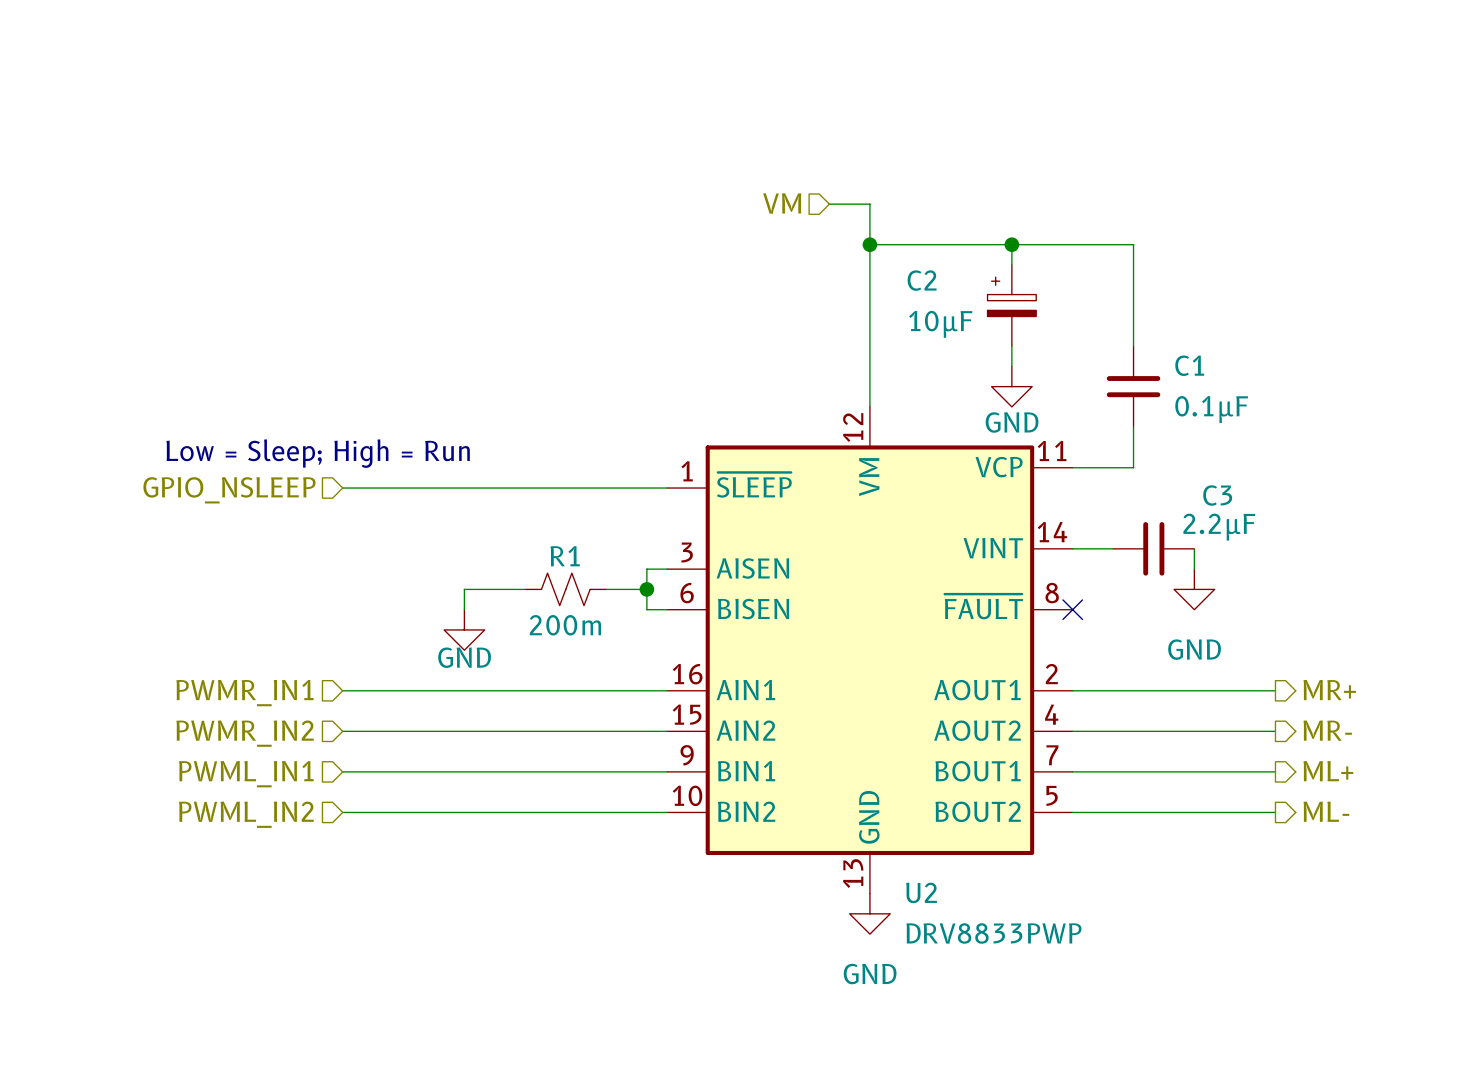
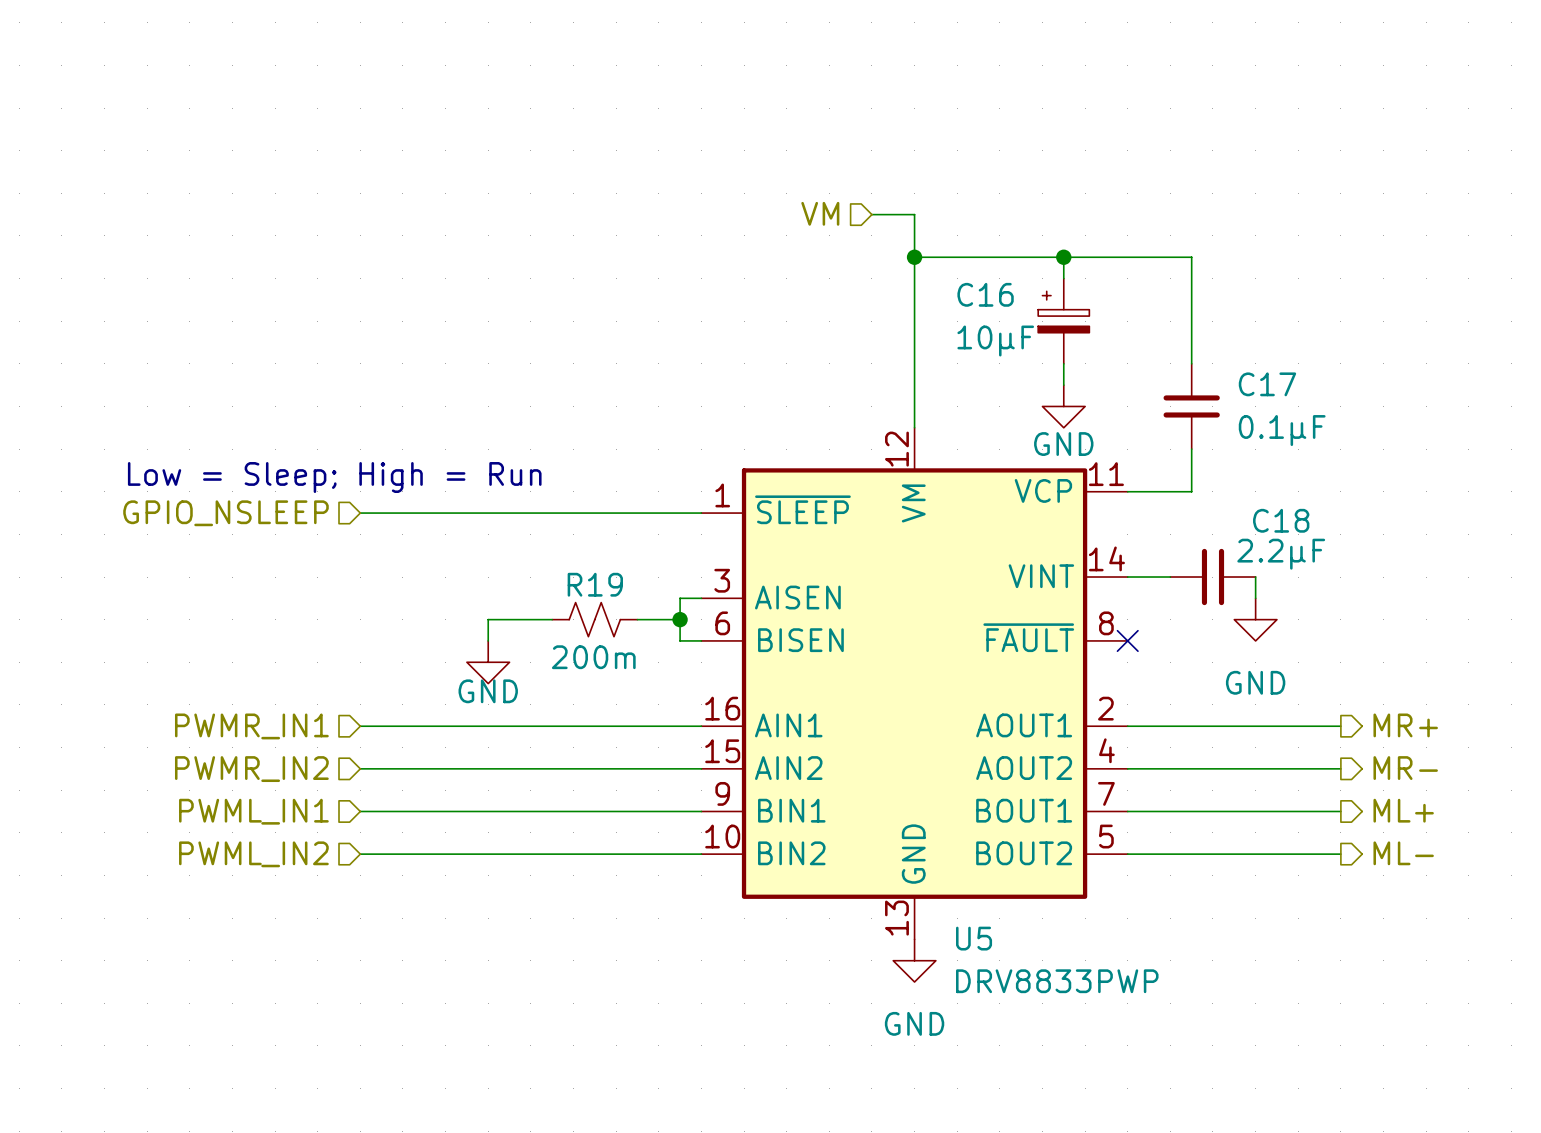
C2 name: C2 (922, 280) -> C16 (985, 294)
C1 name: C1 (1189, 365) -> C17 (1267, 384)
C3 name: C3 (1217, 495) -> C18 (1281, 520)
R1 name: R1 (565, 556) -> R19 (595, 584)
U2 name: U2 (921, 892) -> U5 (974, 938)

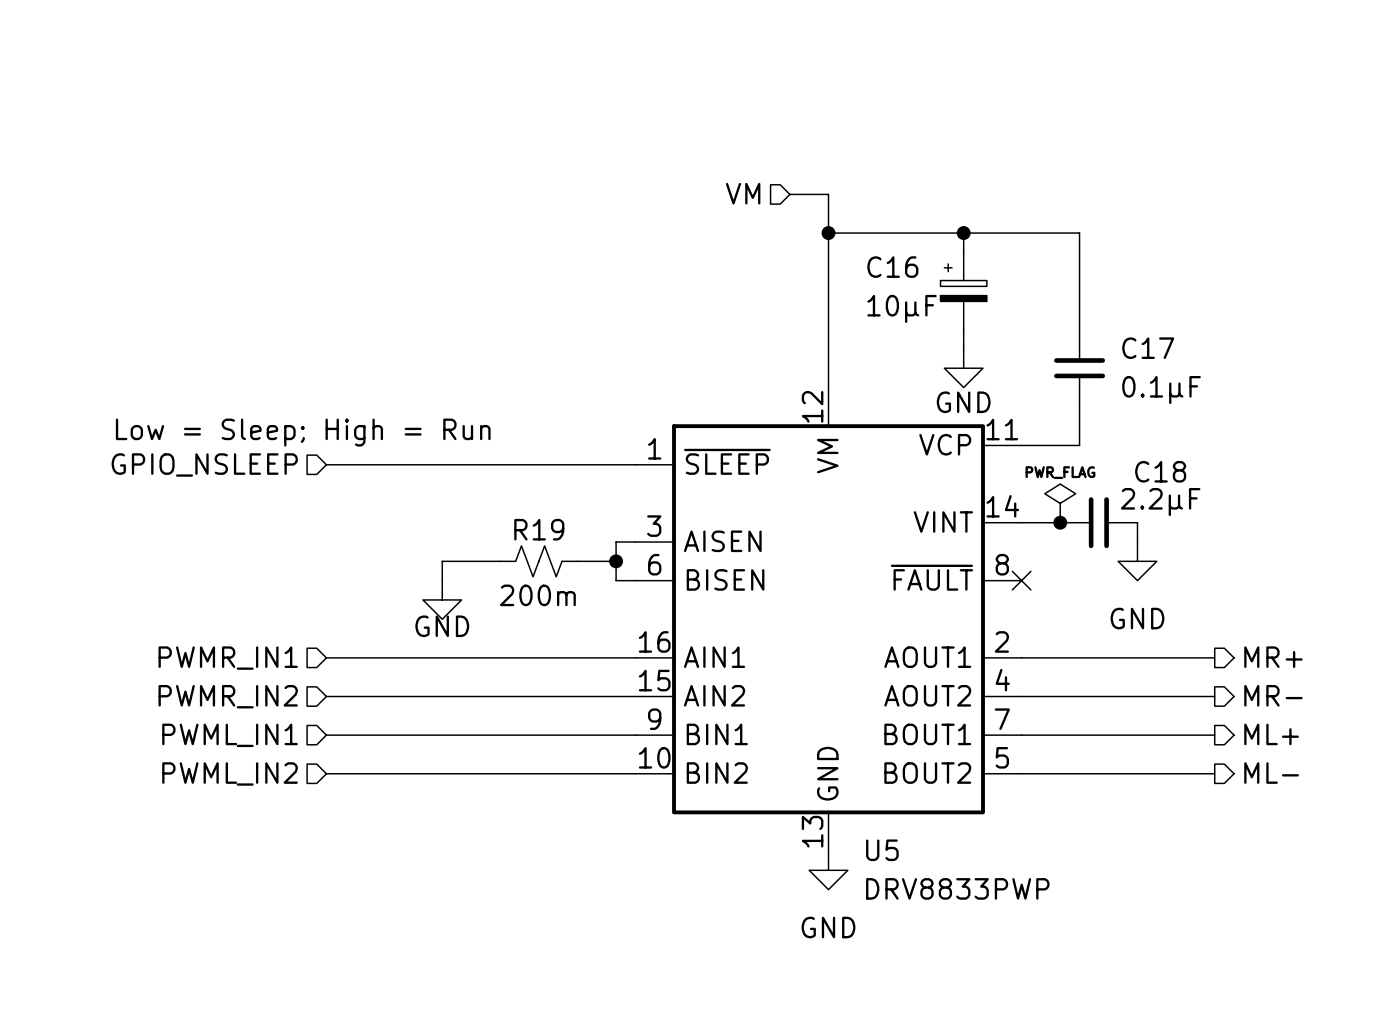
power symbol: none -> PWR_FLAG (1060, 503)
junction: none -> (1060, 522)

